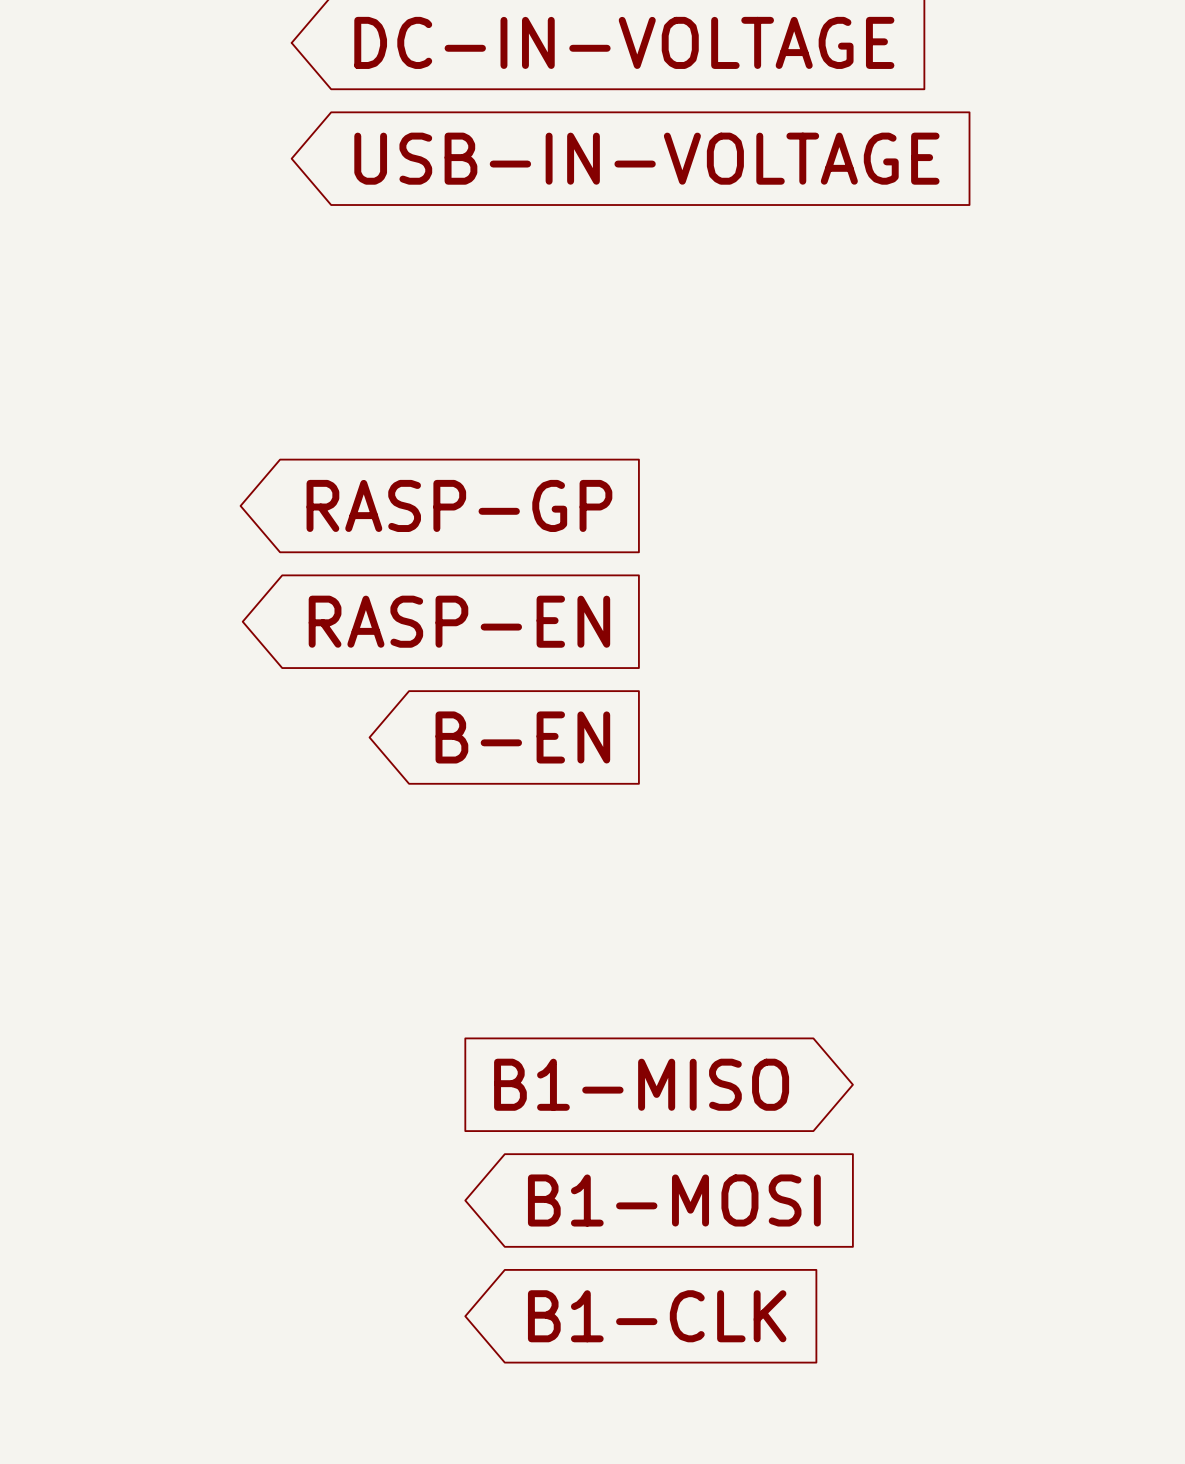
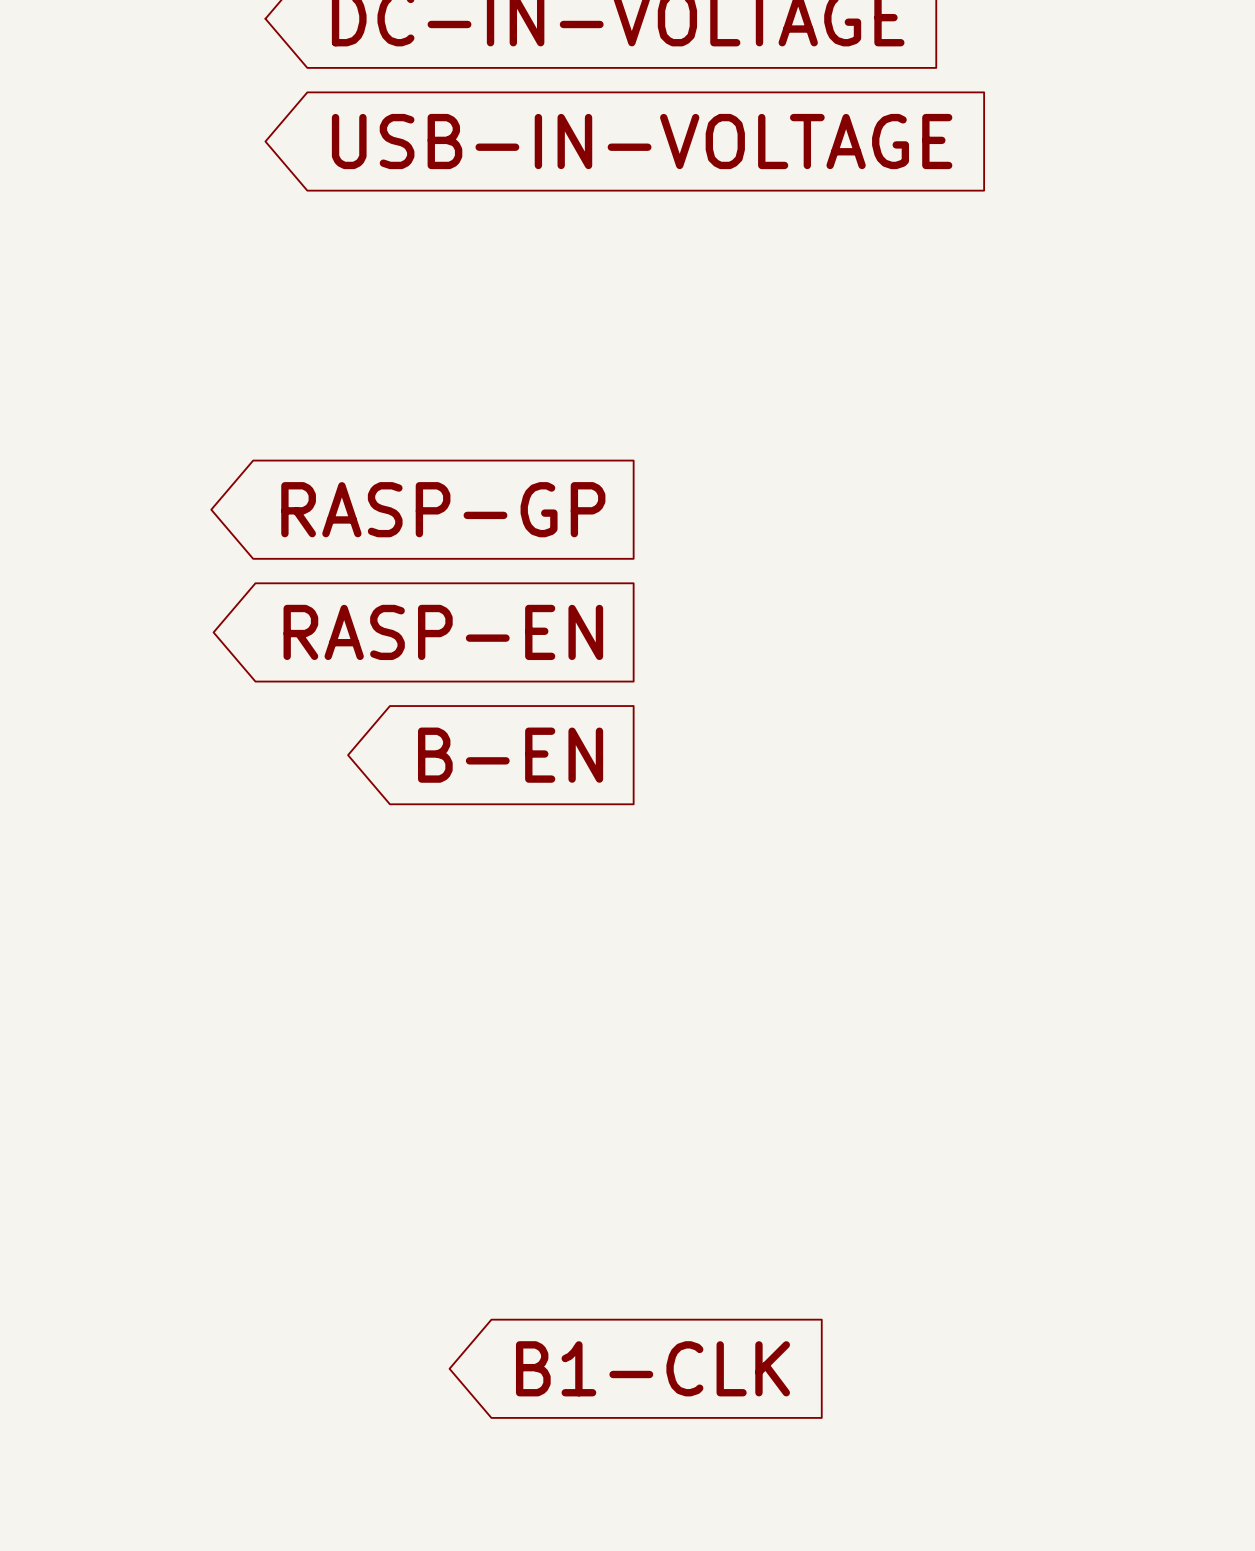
global label: B1-MISO (641, 1084) -> none
global label: B1-MOSI (674, 1200) -> none

